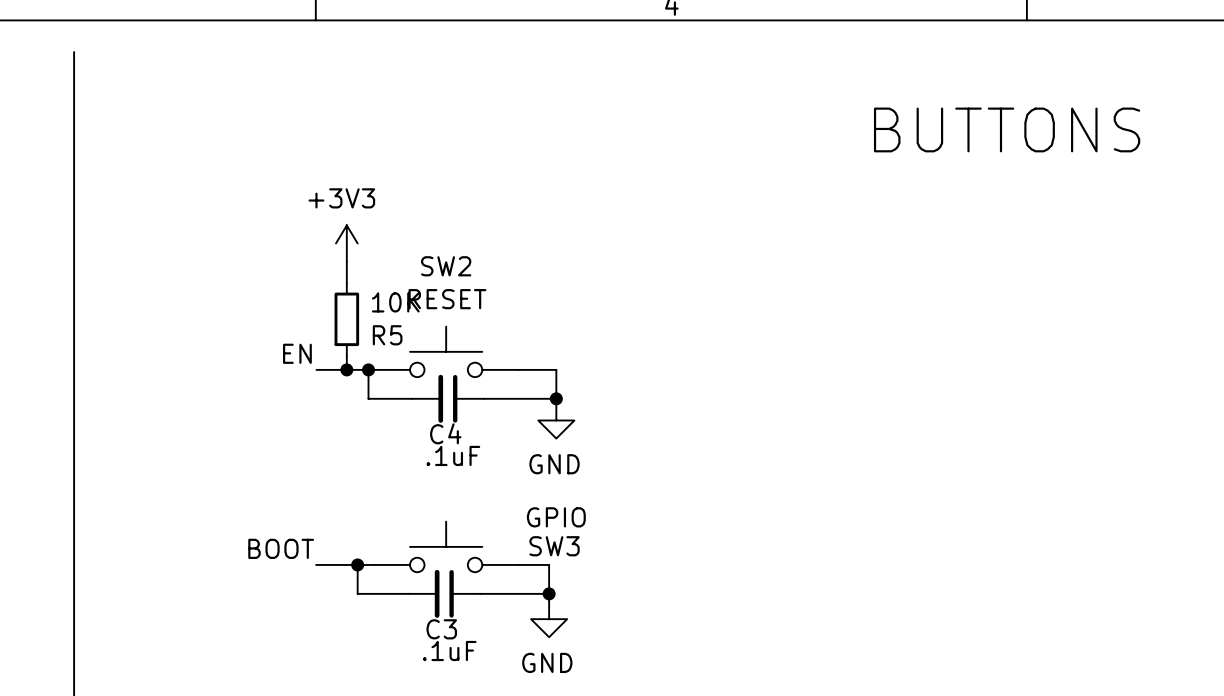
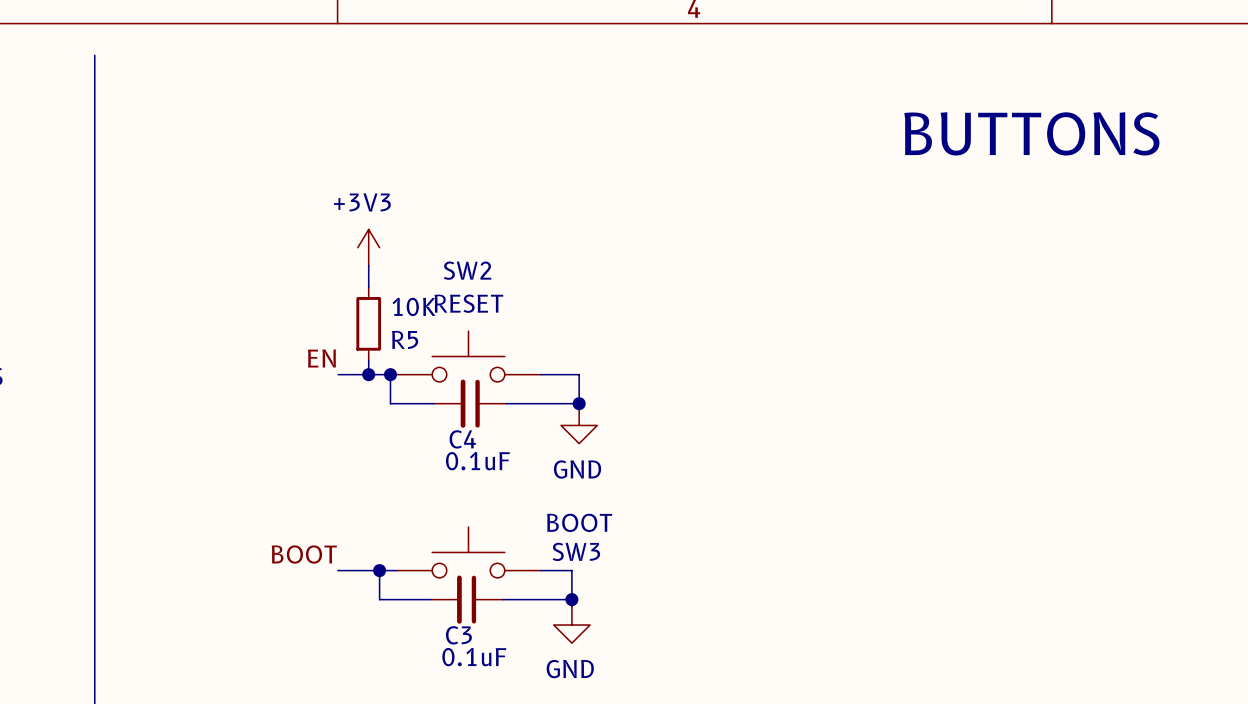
C4 value: .1uF (453, 455) -> 0.1uF (477, 461)
SW3 value: GPIO (556, 517) -> BOOT (579, 522)
C3 value: .1uF (449, 651) -> 0.1uF (474, 657)

